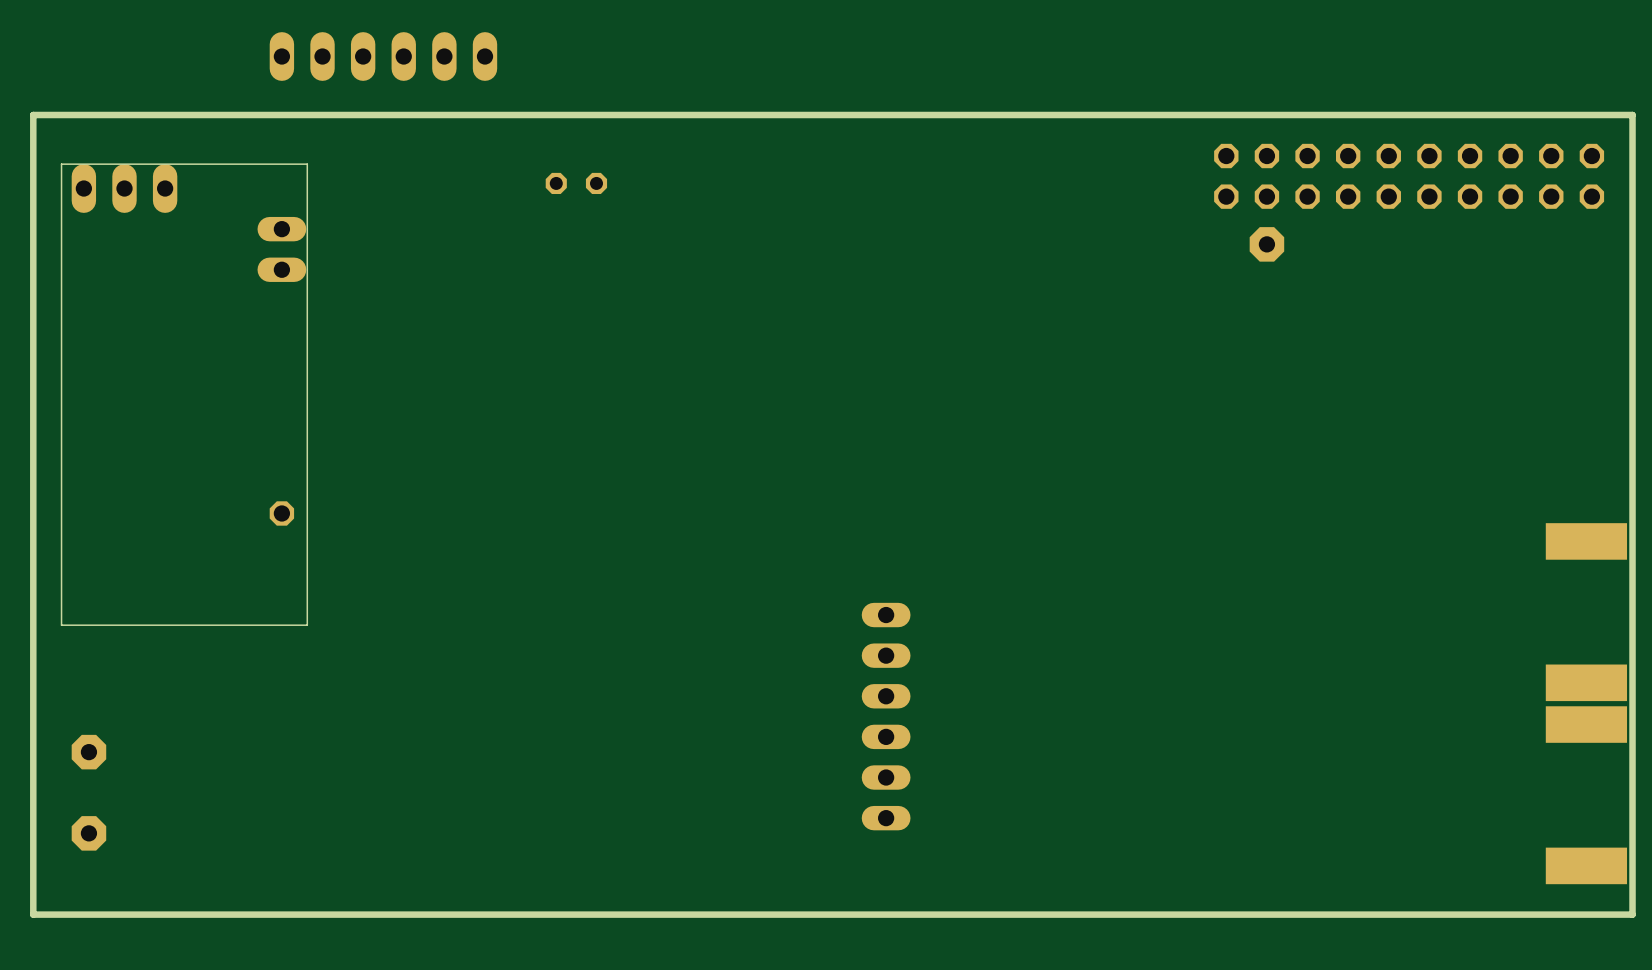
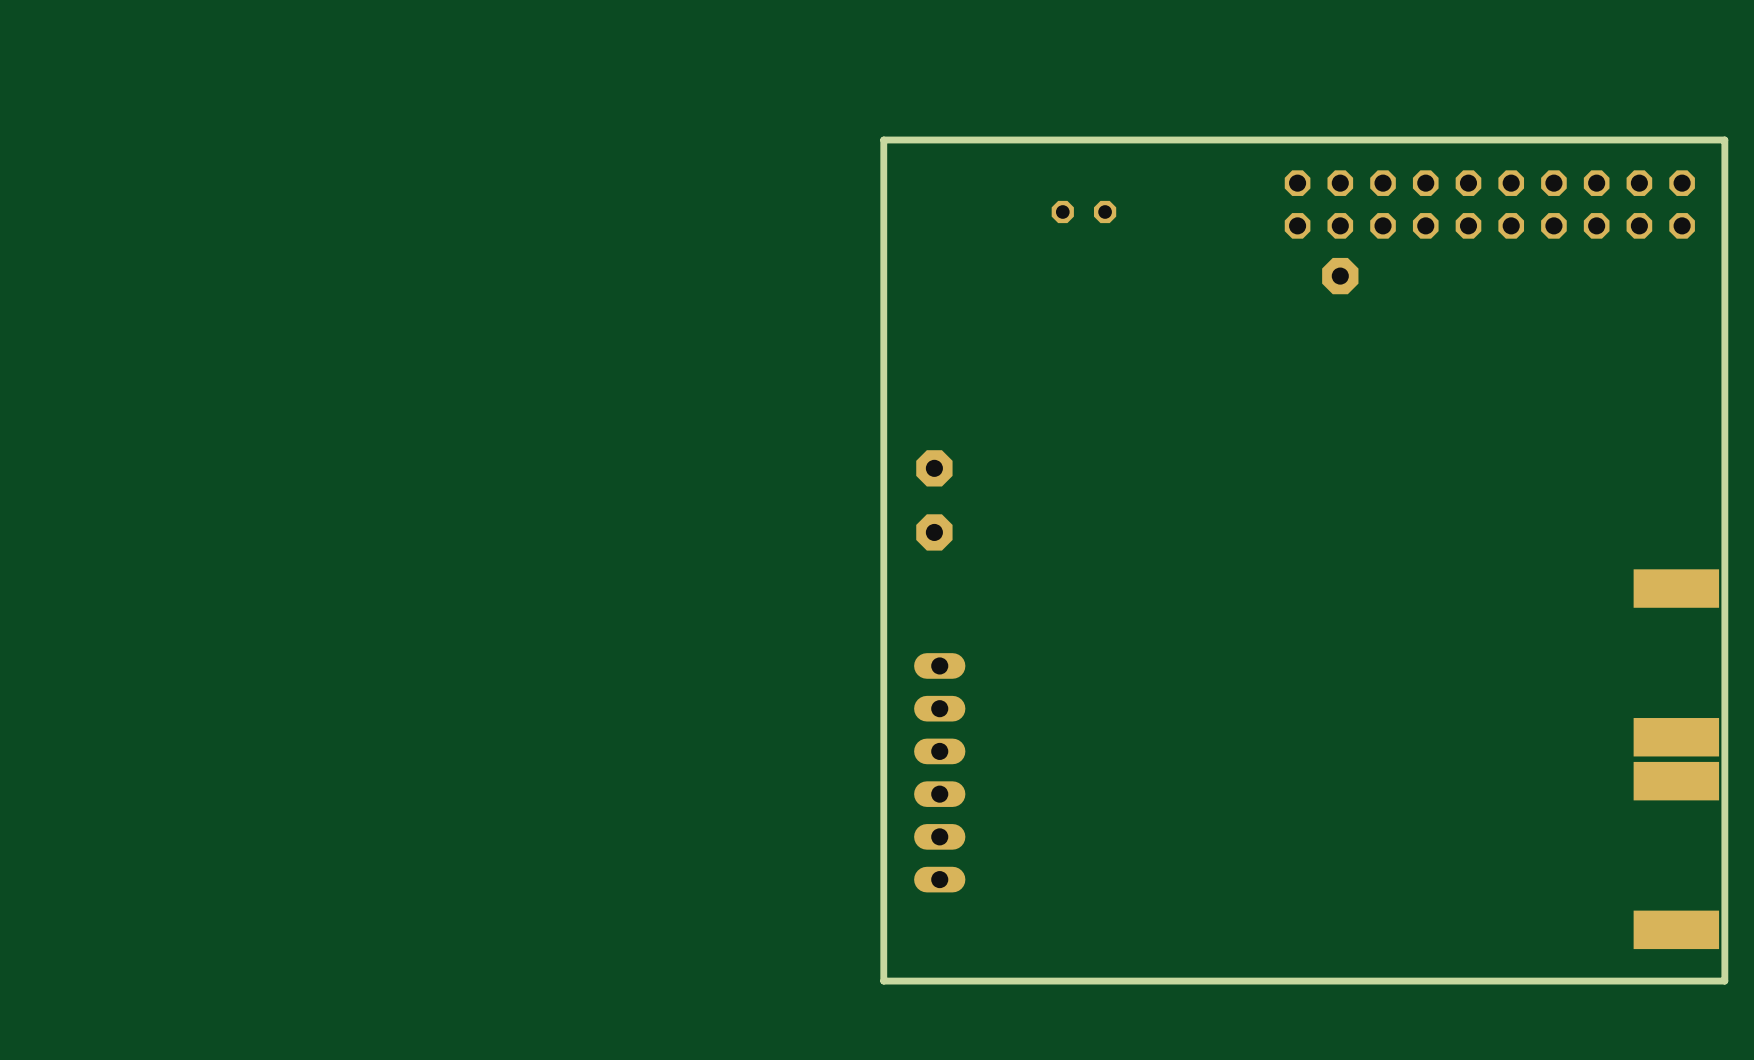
part: (383, 56) -> none
board edge: (832, 115) (33, 115) (33, 914) (832, 914) -> (883, 140) (883, 981)
board edge: (307, 164) (61, 164) (61, 625) (307, 625) (307, 164) -> none
part: (576, 183) -> none
part: none -> (1083, 211)
part: (124, 188) -> none
part: (281, 249) -> none
part: none -> (934, 468)
part: none -> (934, 532)
part: (281, 513) -> none
part: (88, 752) -> none
part: (88, 833) -> none

